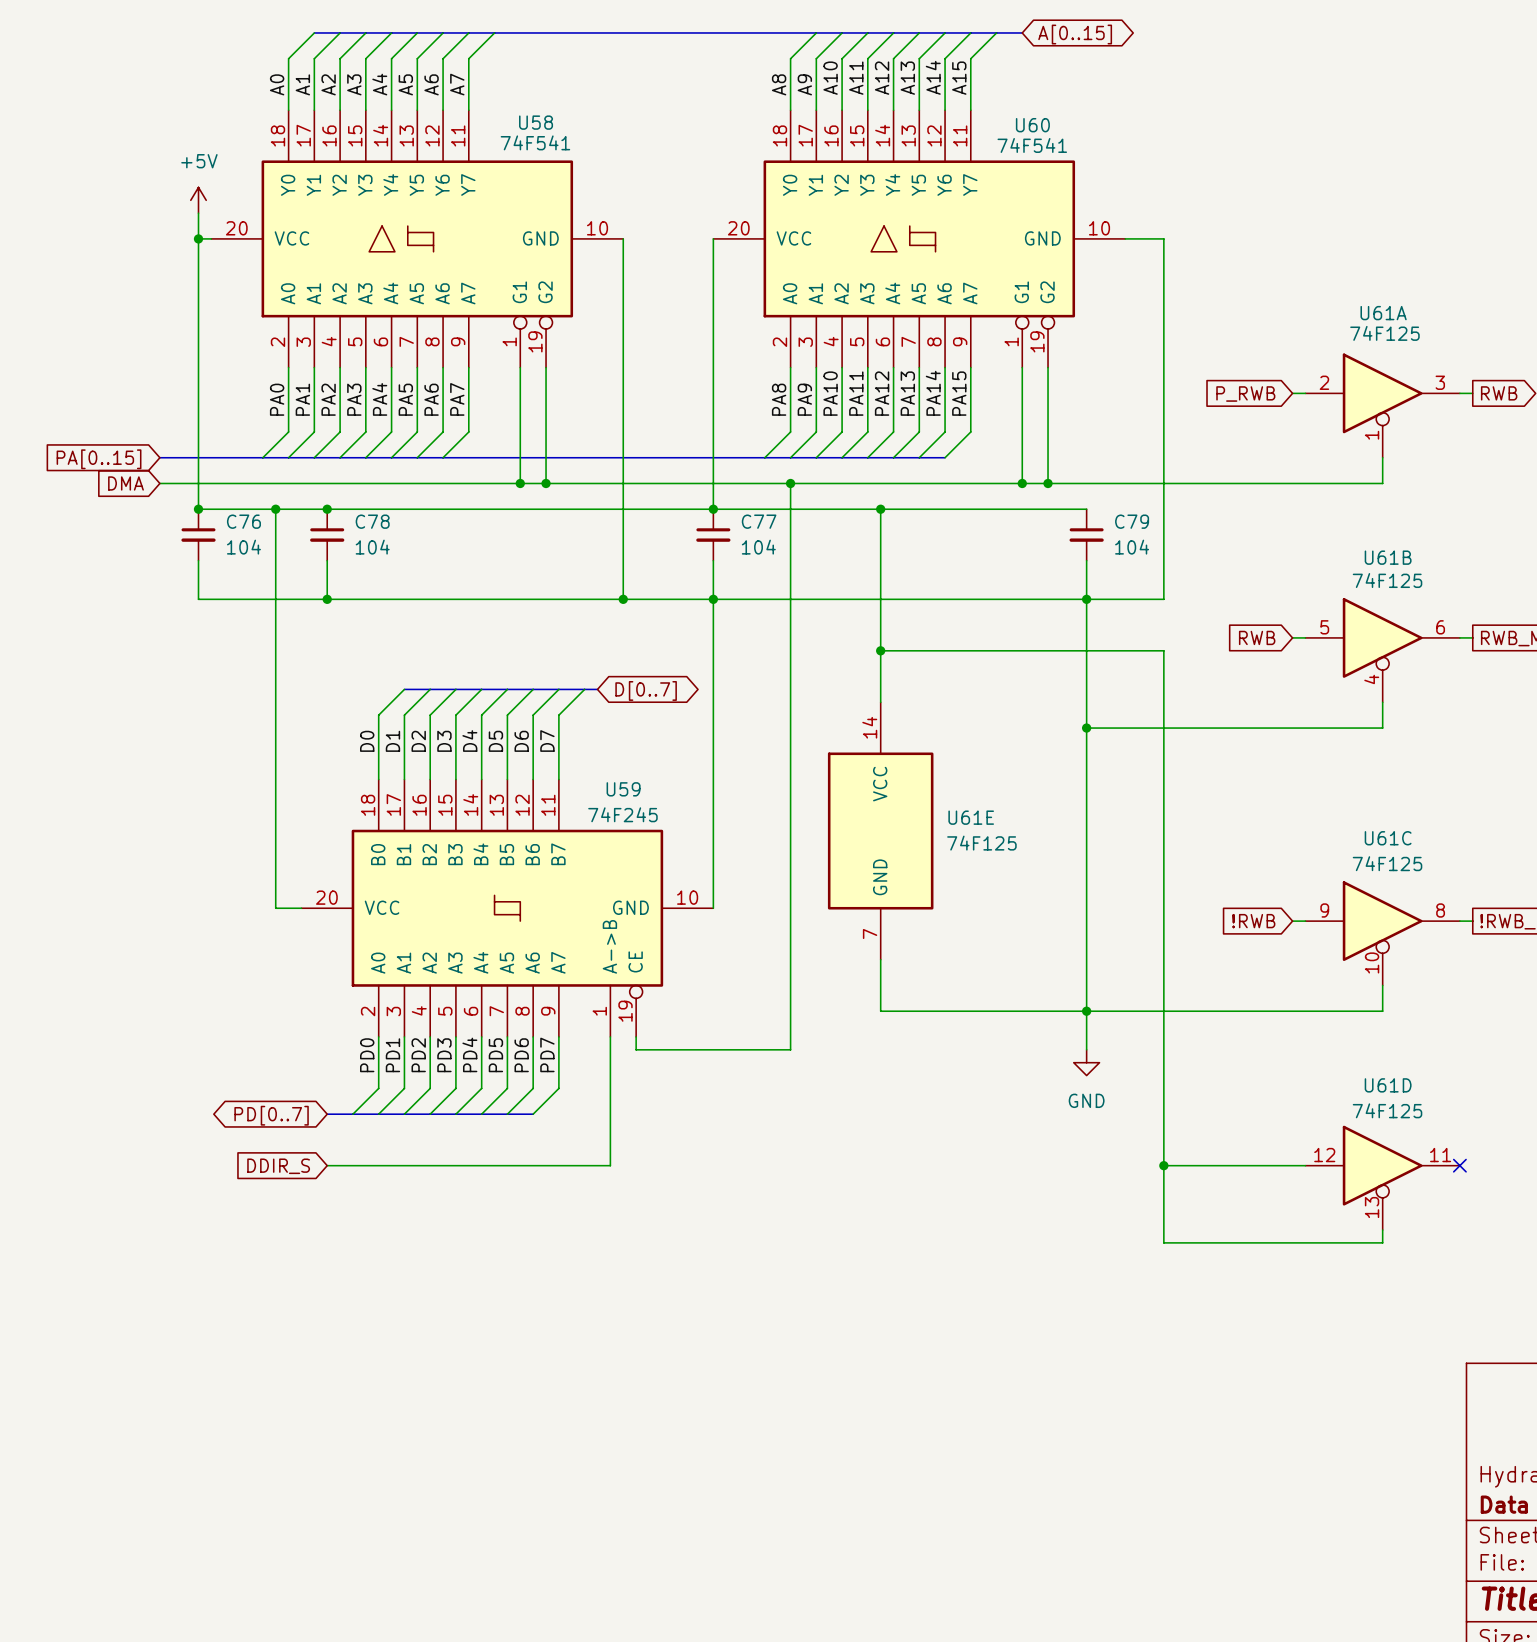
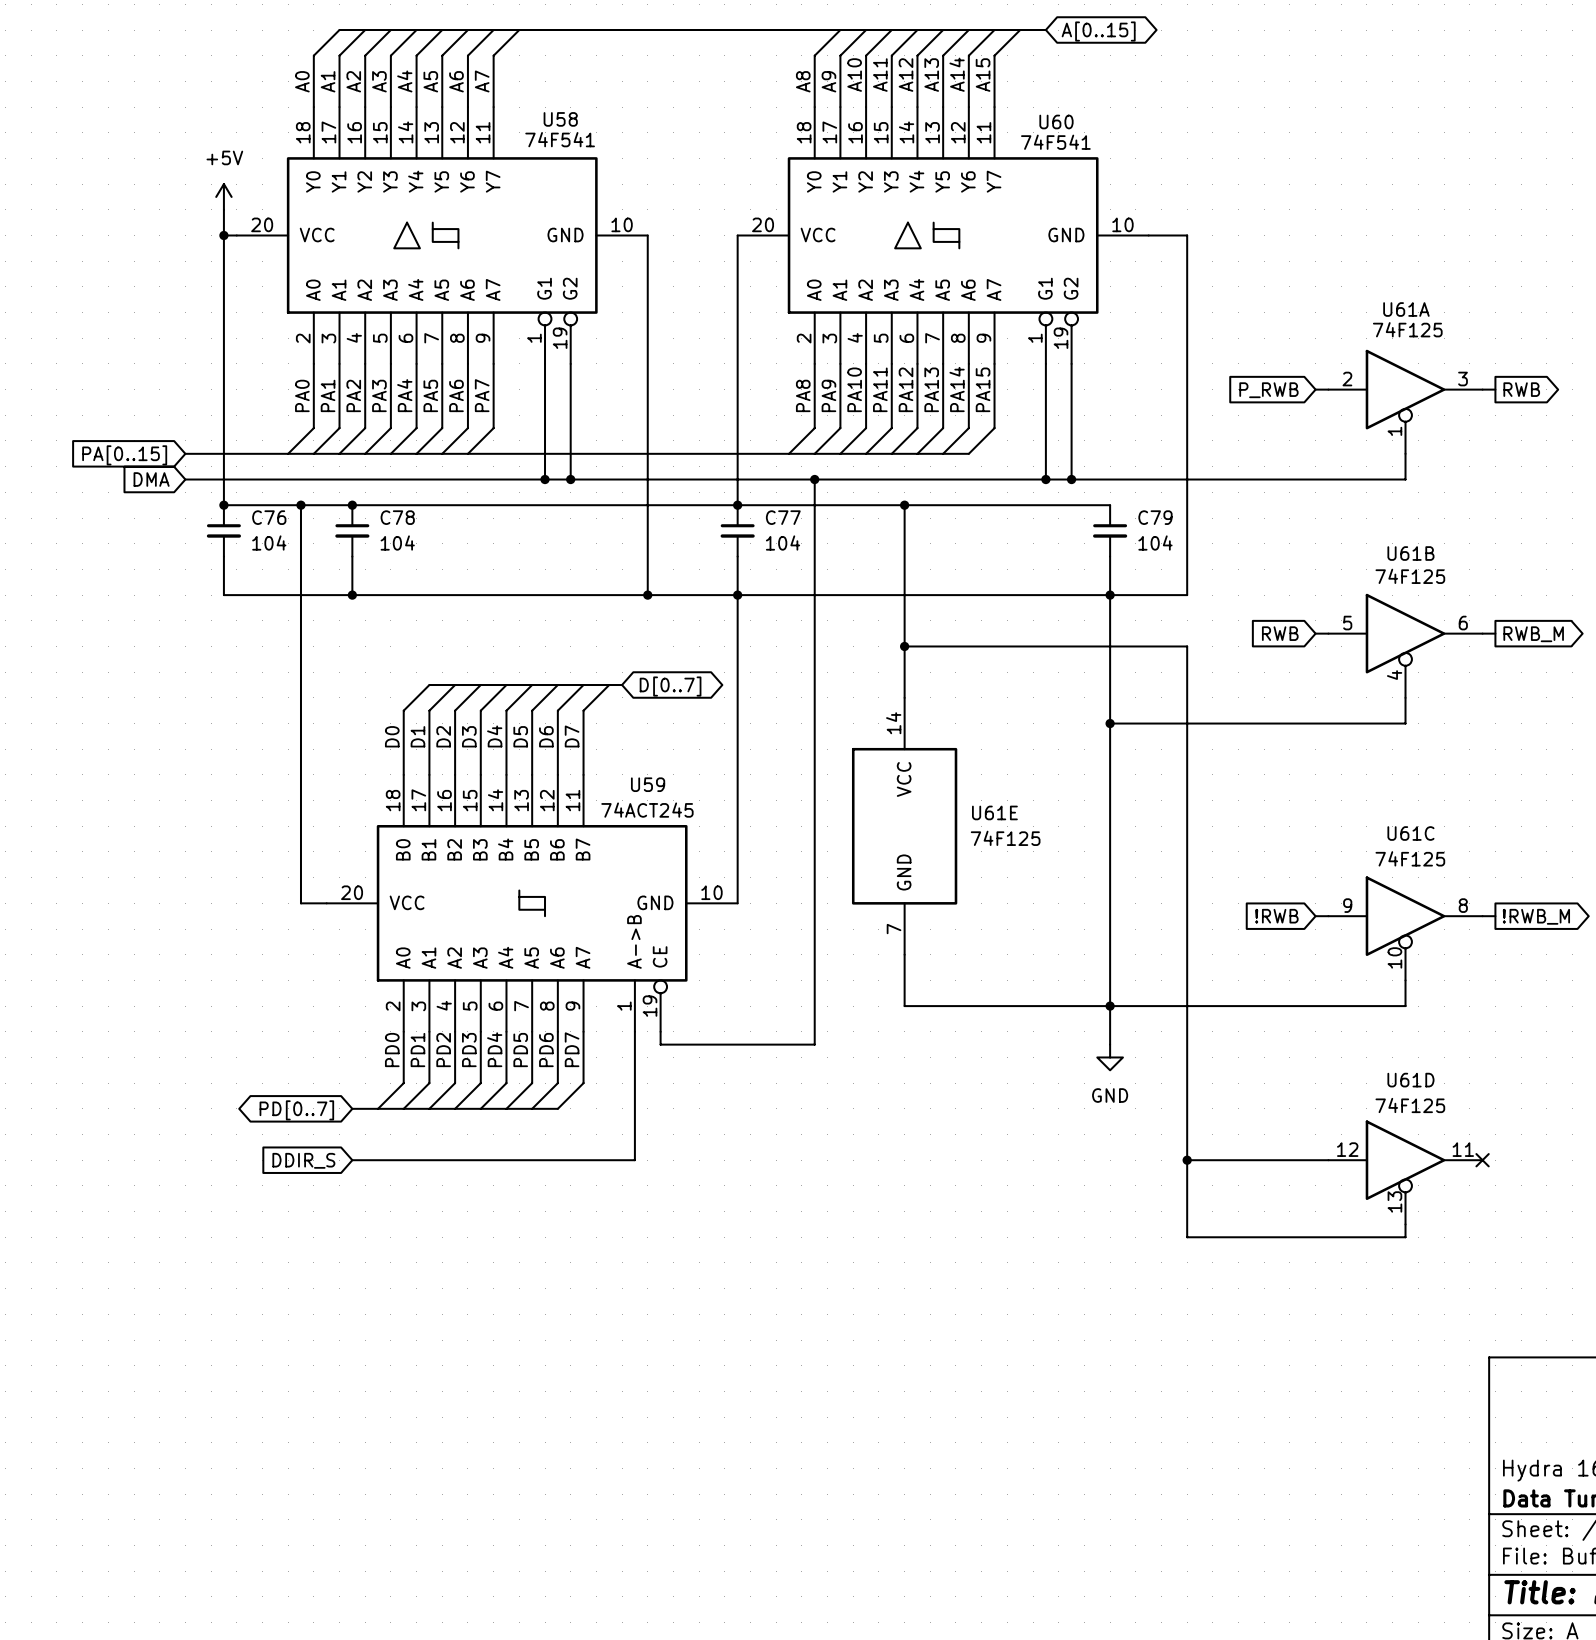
U59 value: 74F245 (622, 814) -> 74ACT245 (647, 810)

